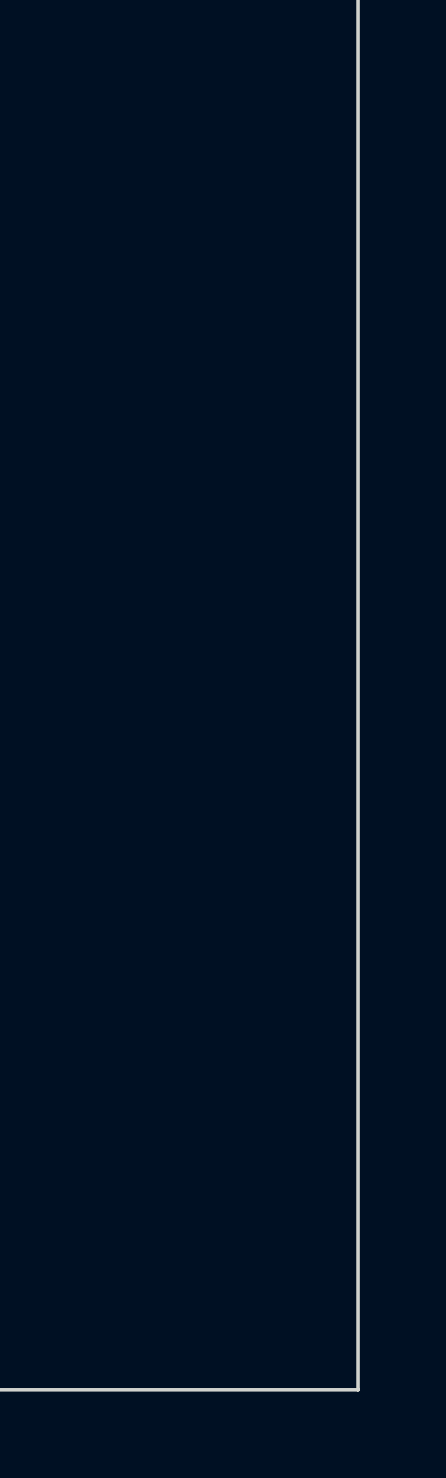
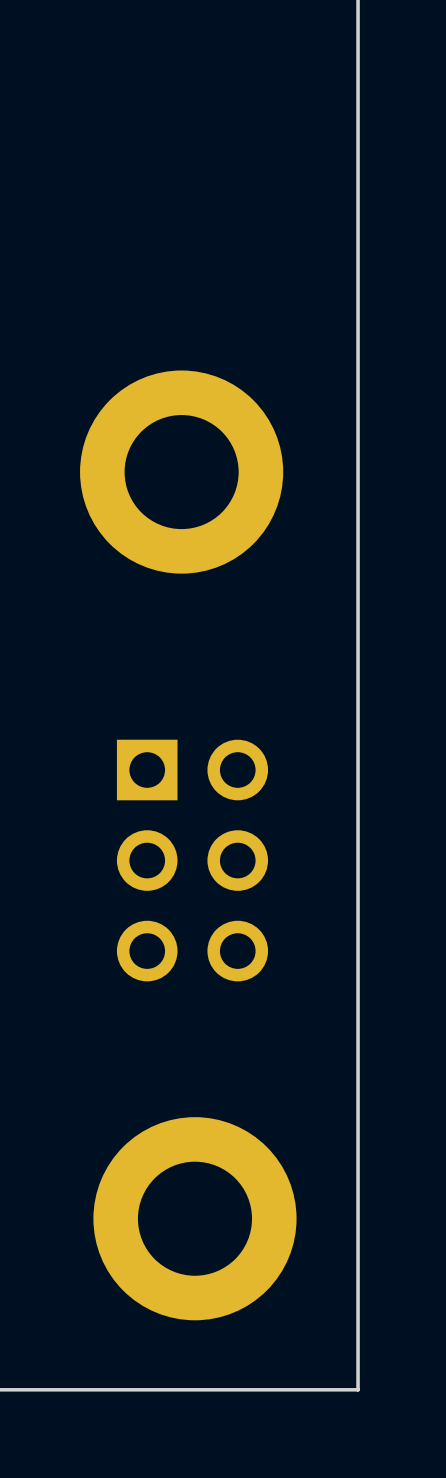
part: none -> (181, 472)
part: none -> (192, 860)
part: none -> (194, 1218)

